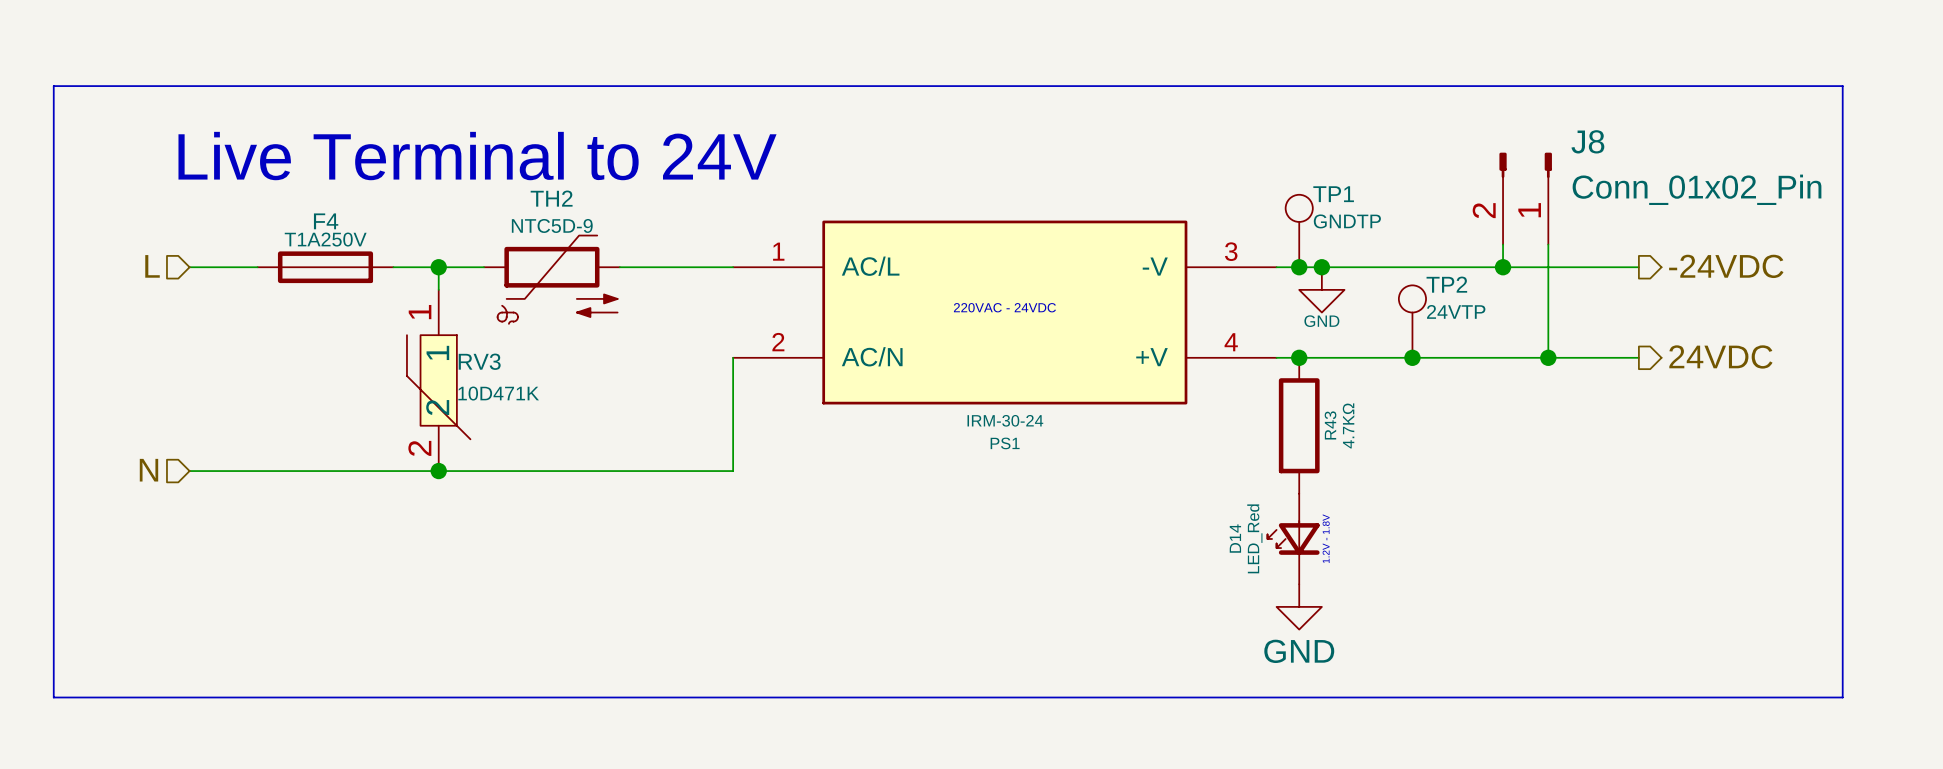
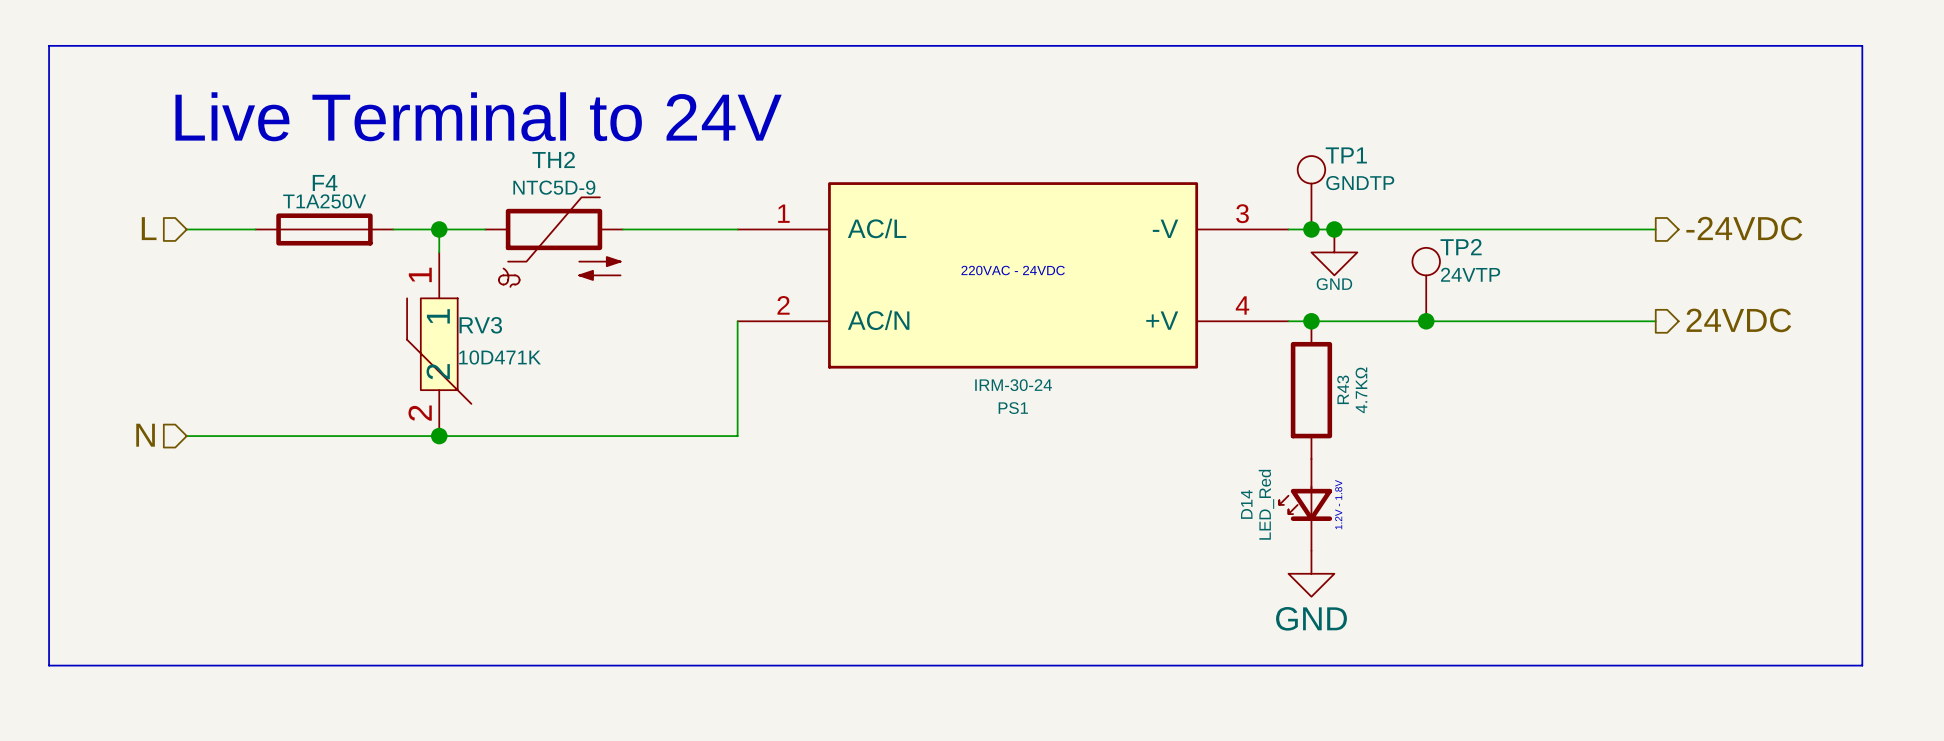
J8: Conn_01x02_Pin (1525, 198) -> none
wire: (1503, 244) (1503, 267) -> none
wire: (1548, 244) (1548, 357) -> none
junction: (1503, 267) -> none
junction: (1548, 357) -> none

